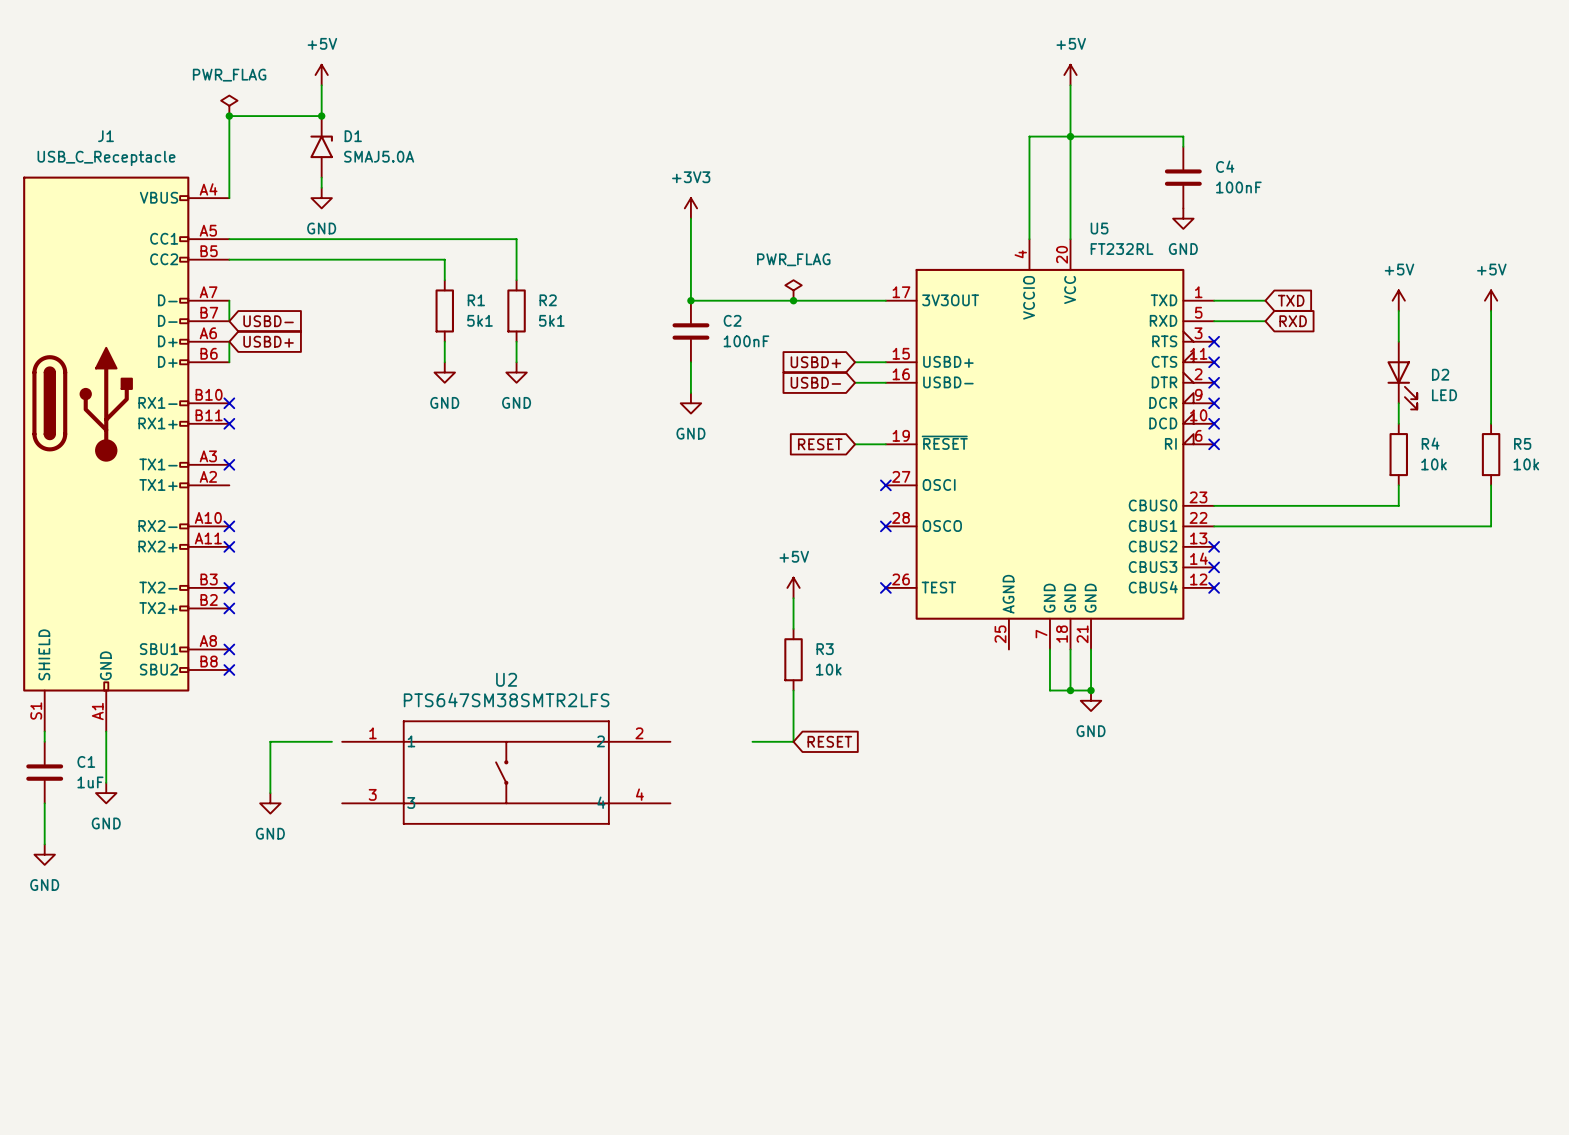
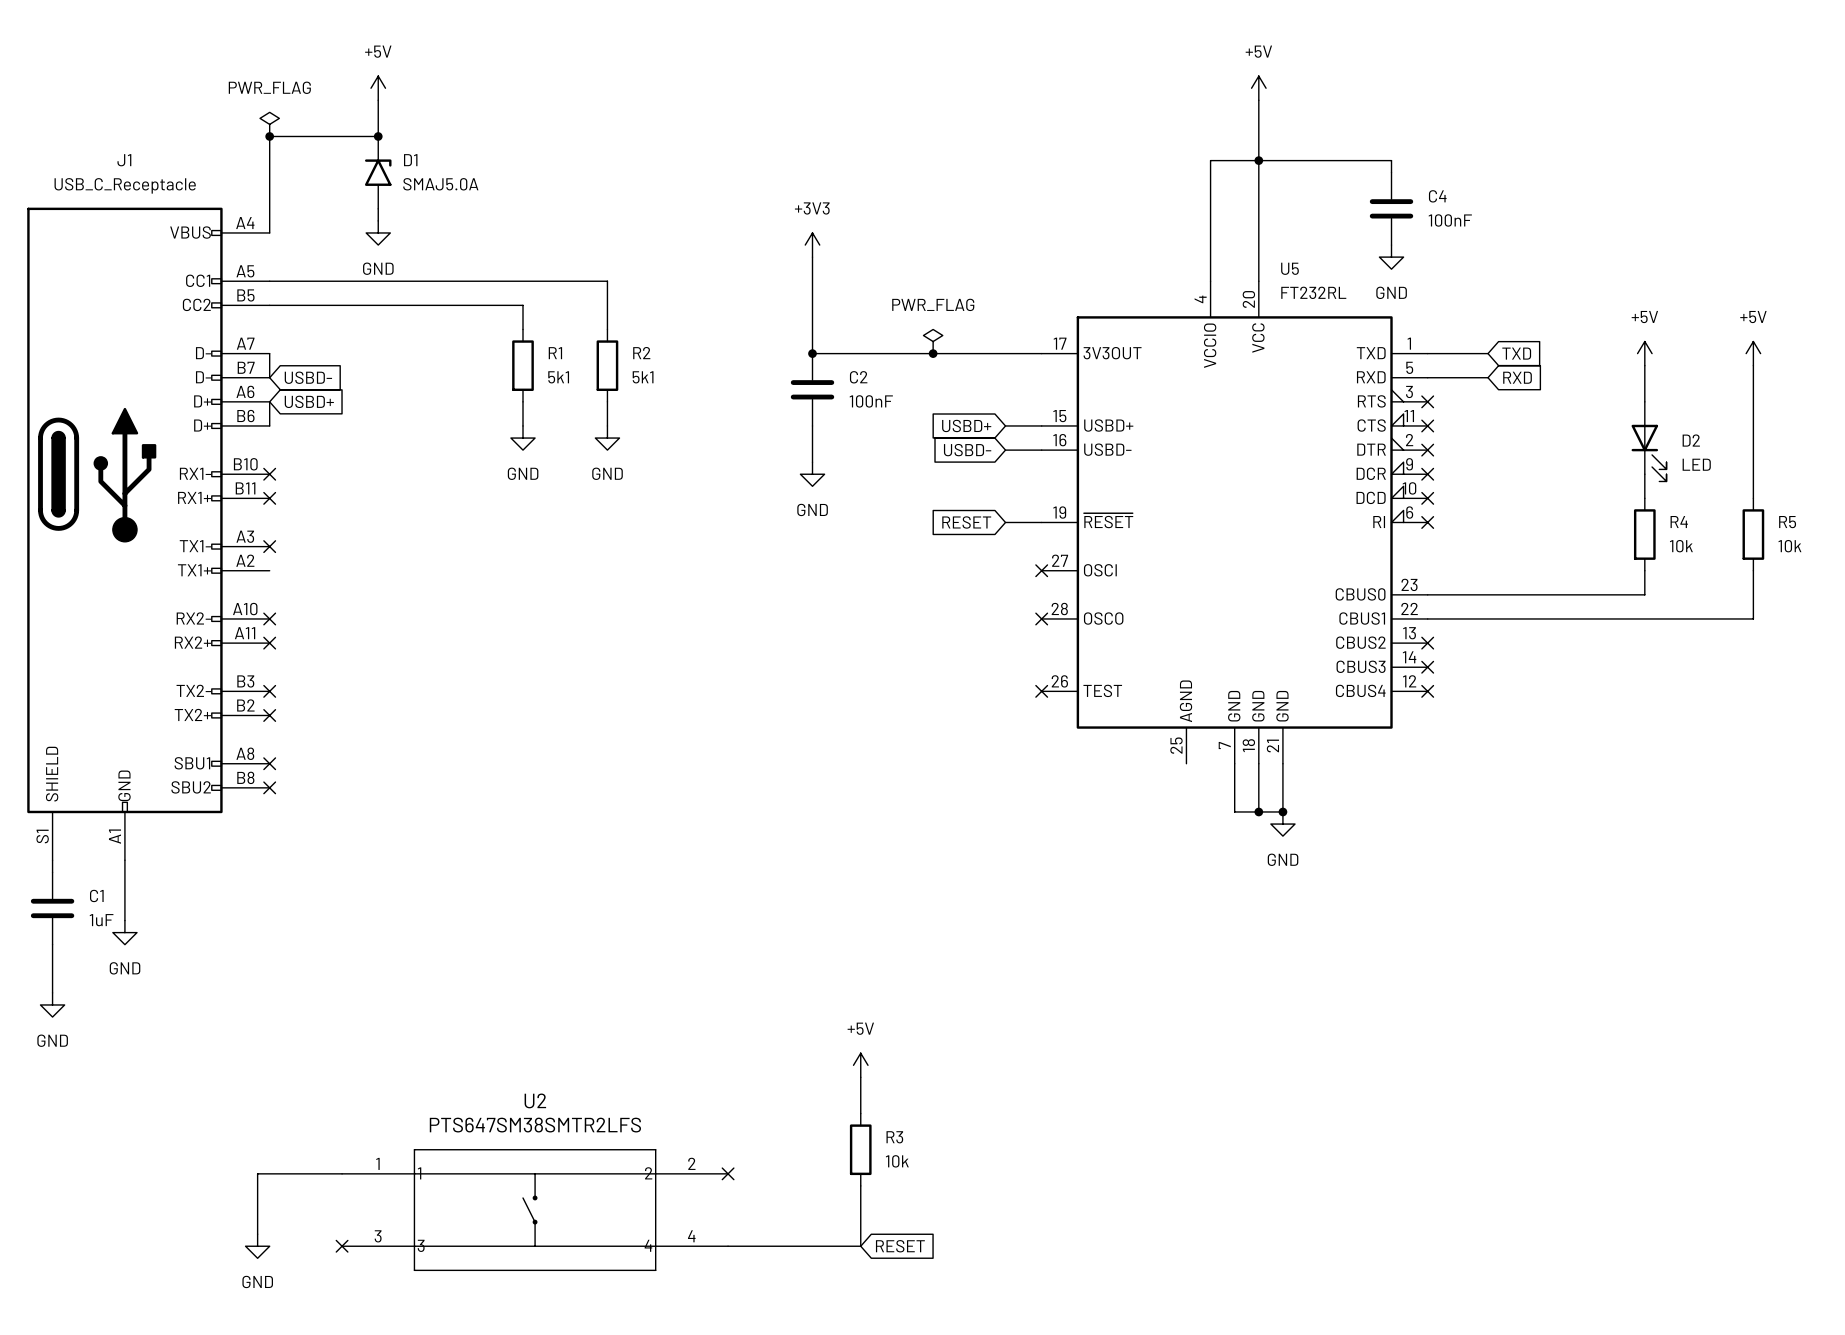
power symbol: +5V (793, 587) -> none
wire: (793, 598) (793, 628) -> none
R3 position: (793, 659) -> (860, 1149)
wire: (793, 690) (793, 741) (752, 741) -> none
wire: (331, 741) (270, 741) (270, 793) -> none
global label: RESET (829, 741) -> none
U2 position: (506, 772) -> (535, 1210)
power symbol: GND (270, 803) -> none
power symbol: none -> +5V (860, 1065)
wire: none -> (860, 1077) (860, 1113)
wire: none -> (342, 1173) (257, 1173) (257, 1234)
no-connect mark: none -> (728, 1173)
wire: none -> (860, 1185) (860, 1246) (728, 1246)
power symbol: none -> GND (257, 1246)
no-connect mark: none -> (342, 1246)
global label: none -> RESET (900, 1246)

